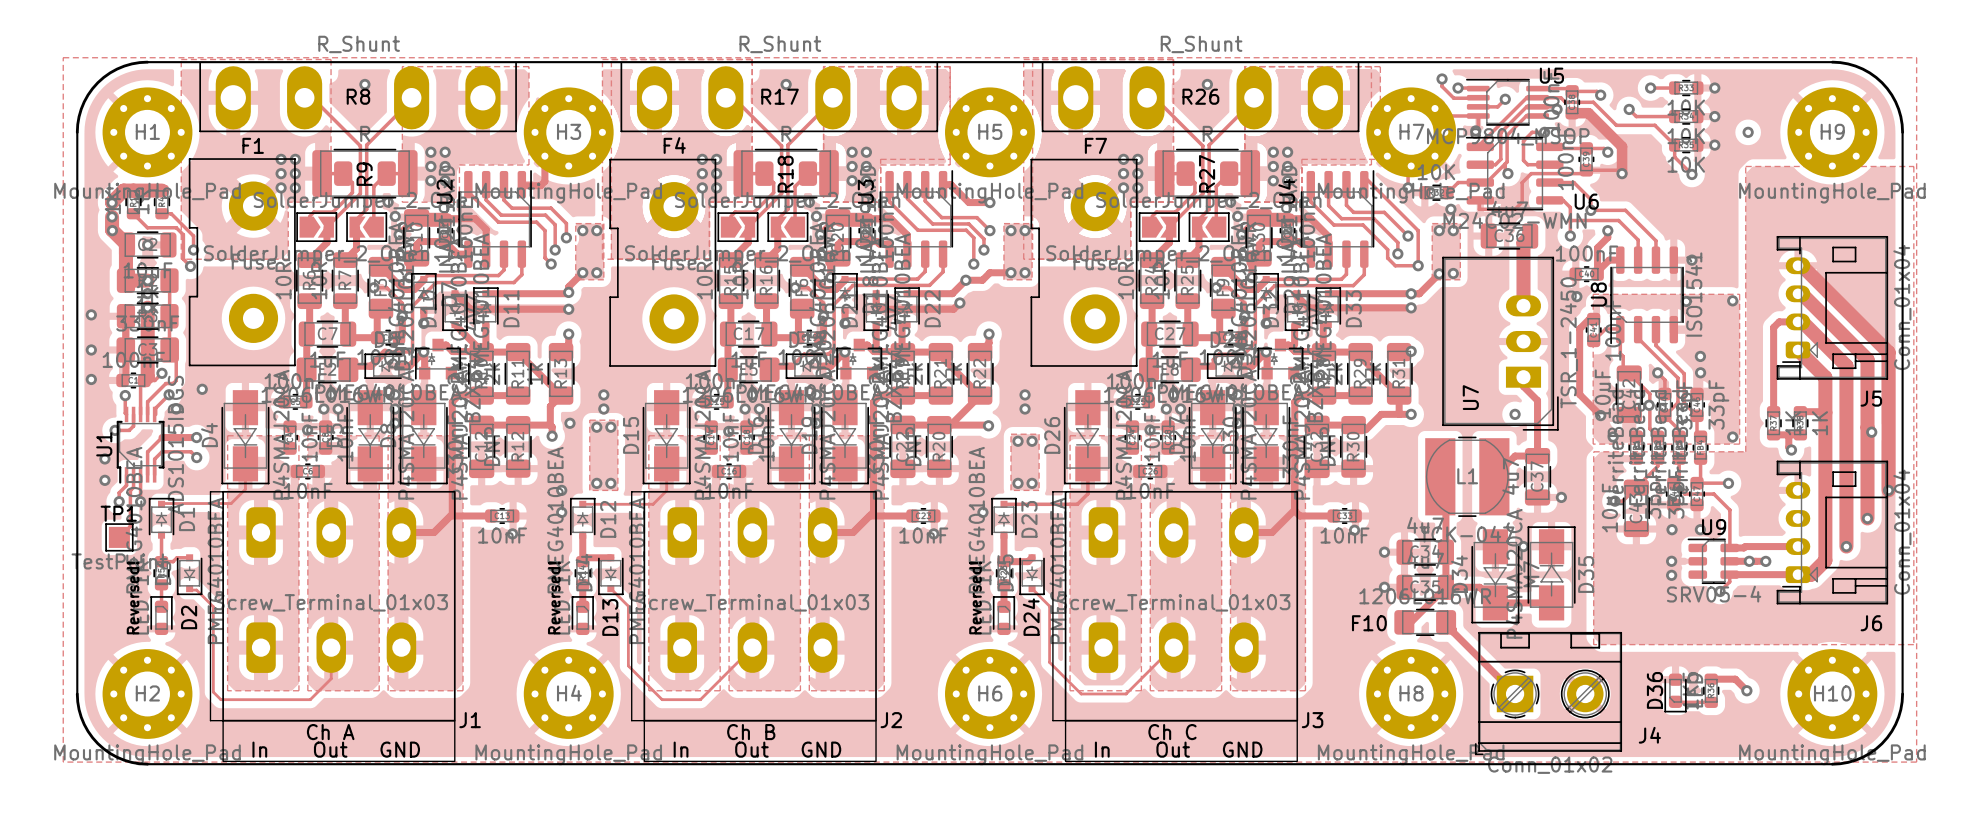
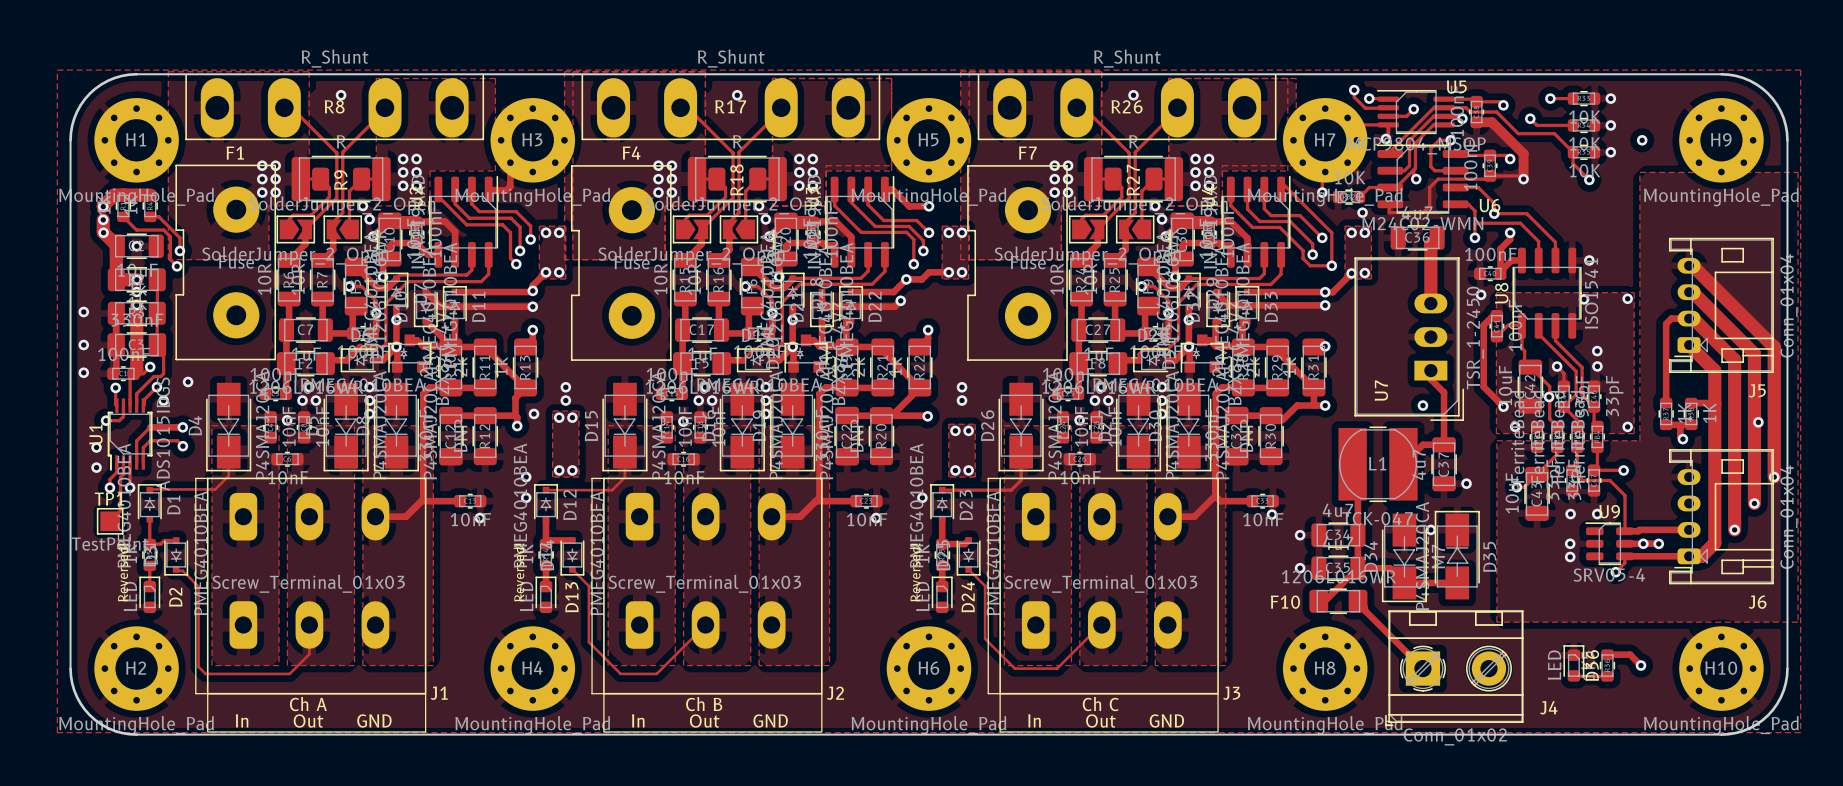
track: none -> (396, 320) (396, 346)
track: none -> (792, 320) (792, 346)
track: none -> (1188, 320) (1188, 346)
D36 rotation: 0° (1675, 693) -> 180° (1573, 663)

